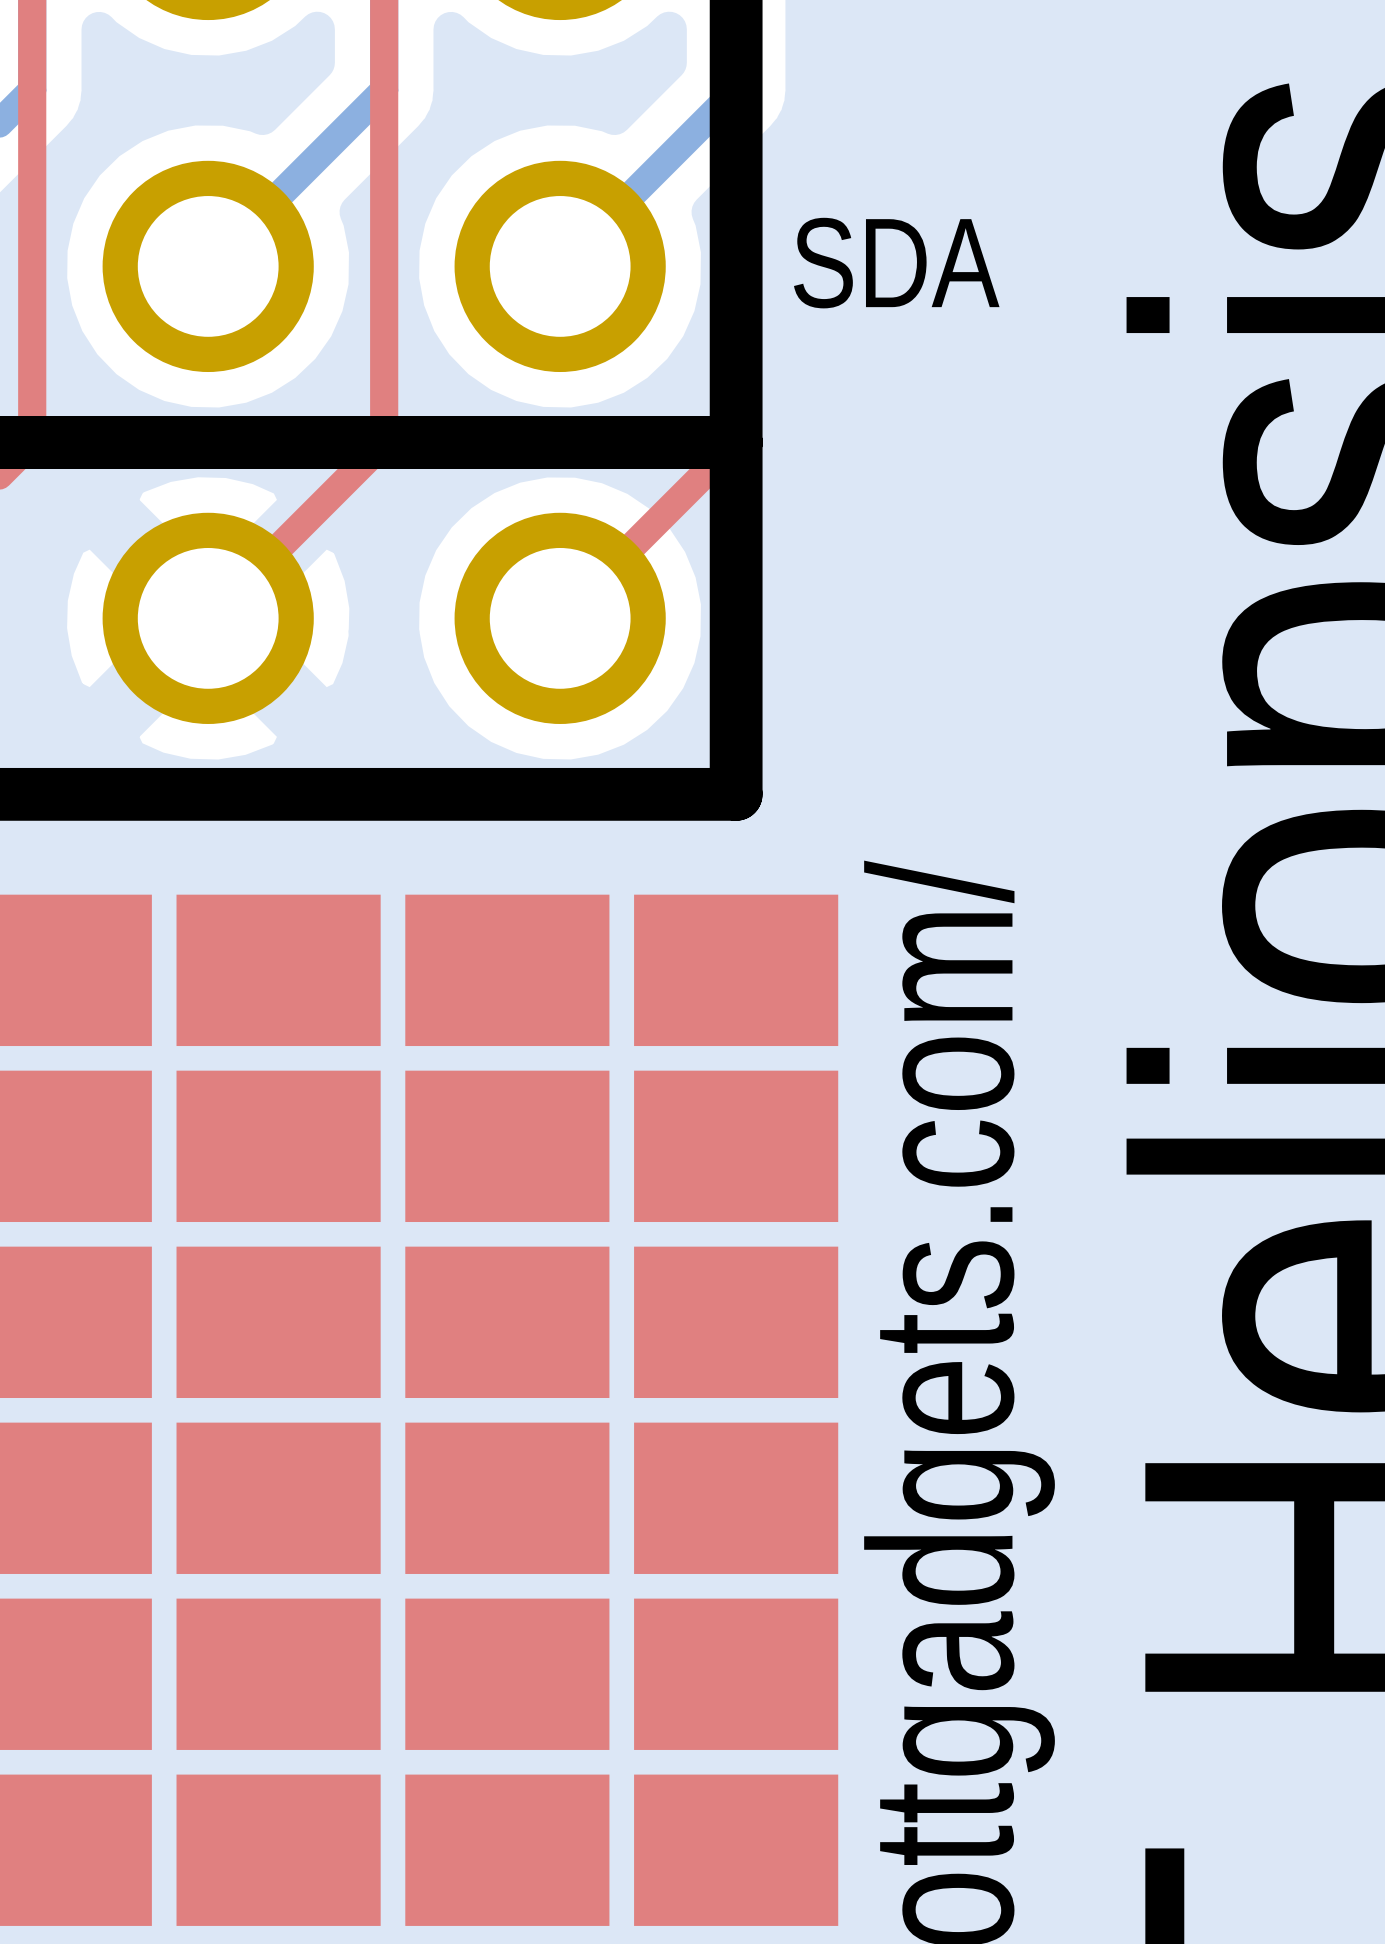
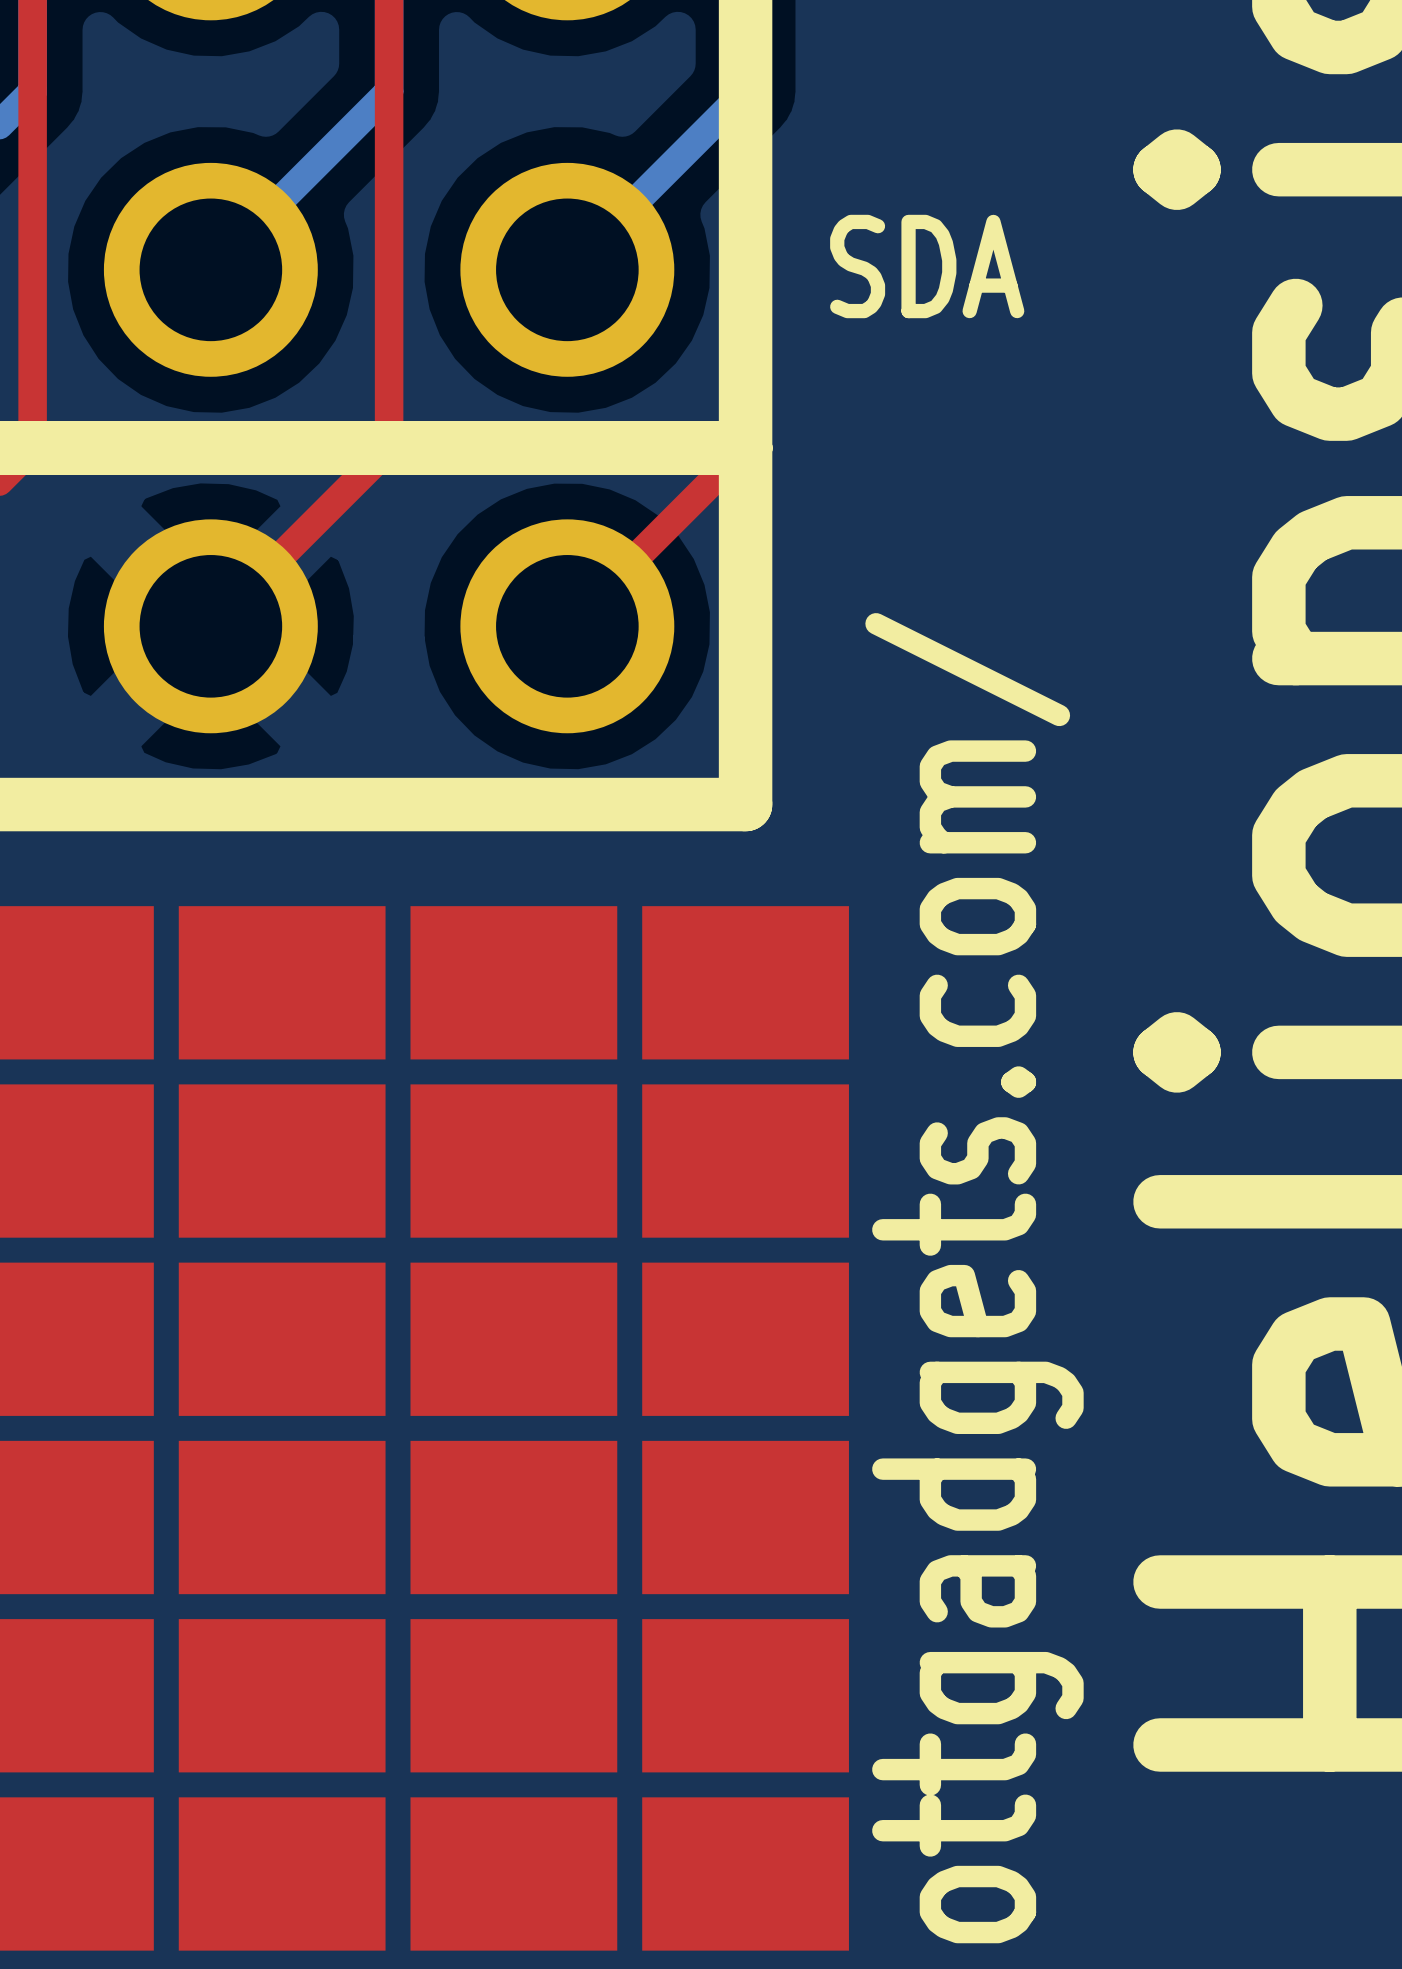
text position: SDA (896, 263) -> SDA (927, 266)

